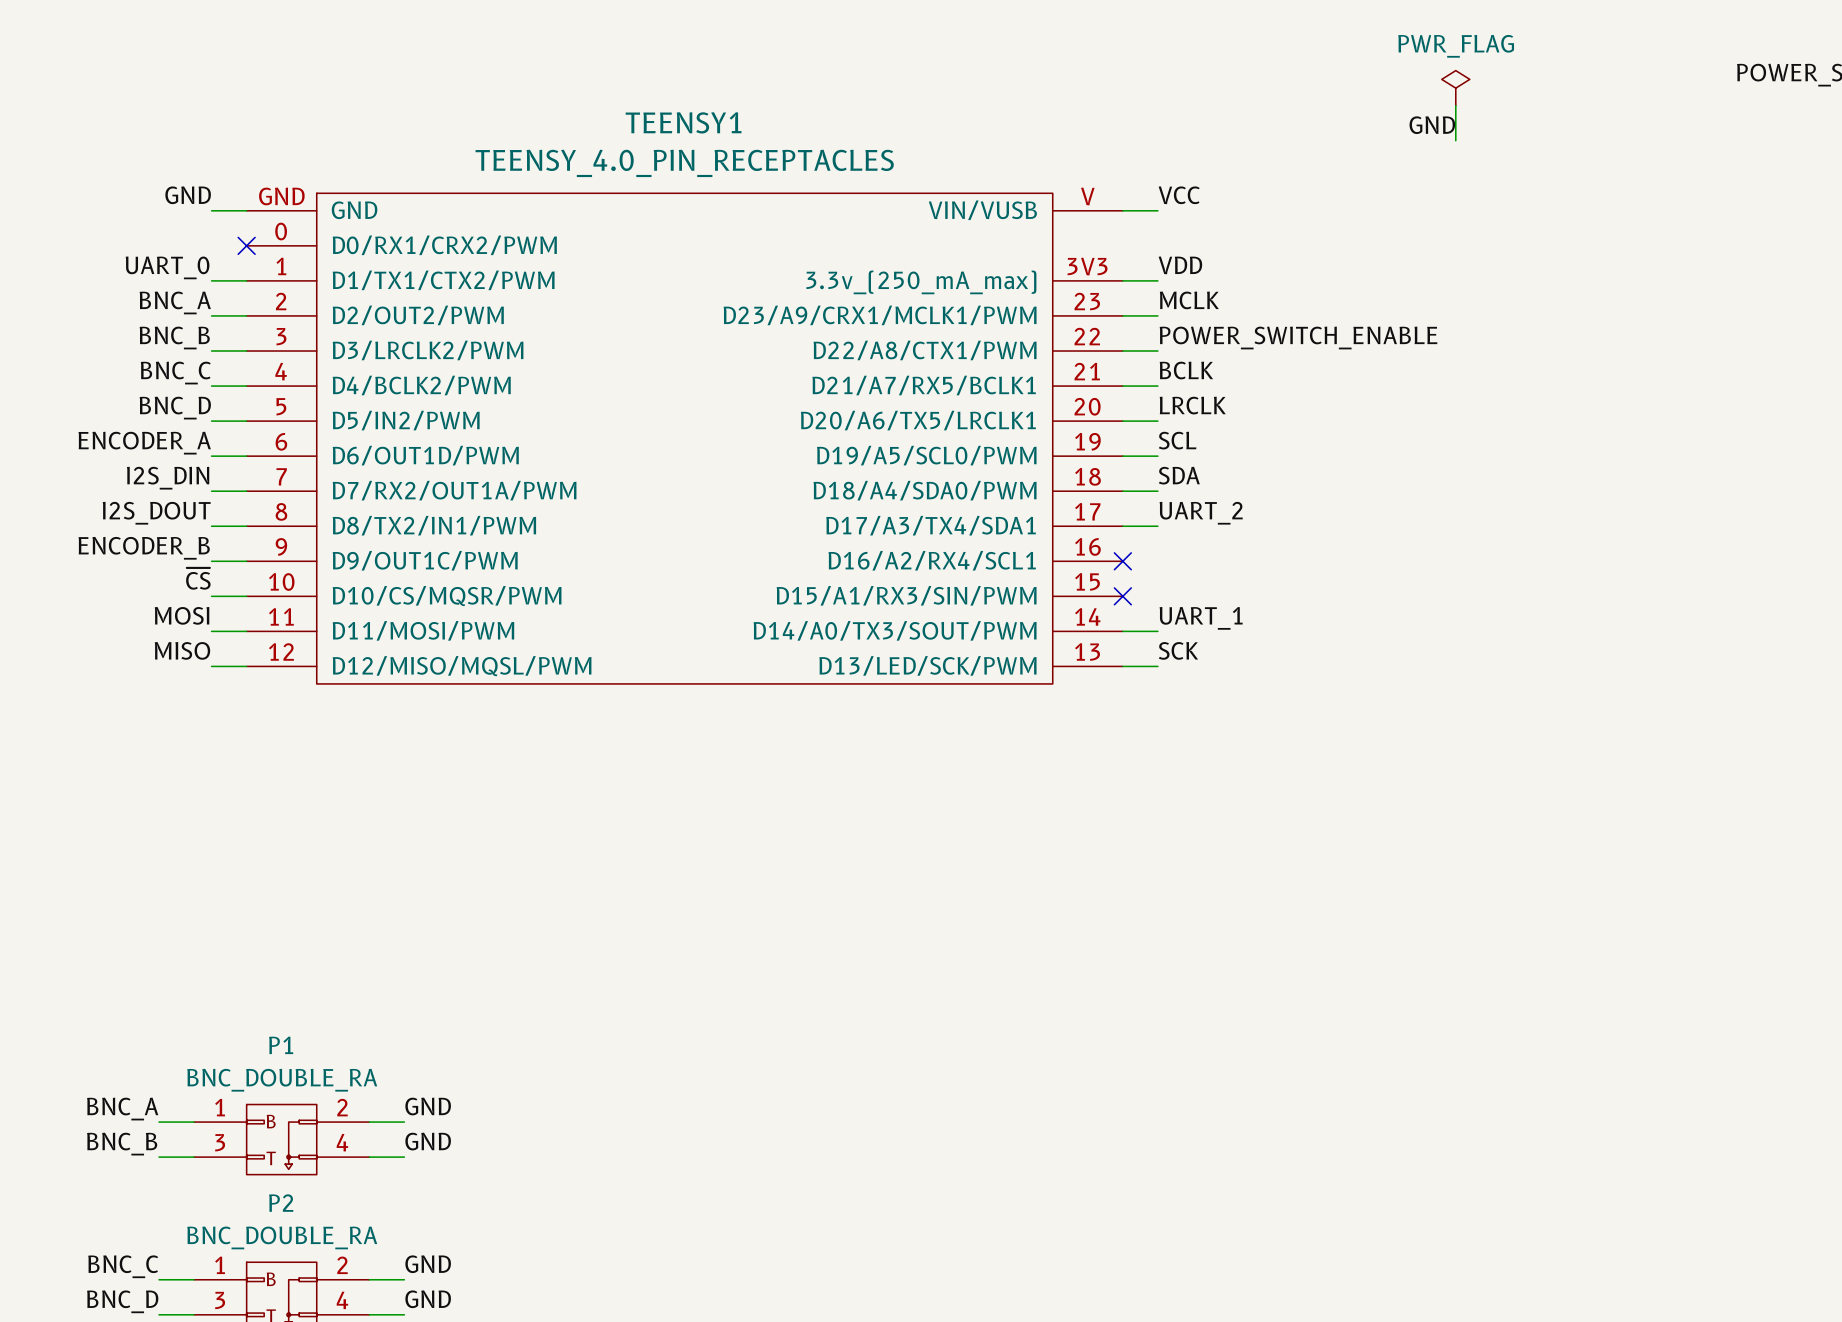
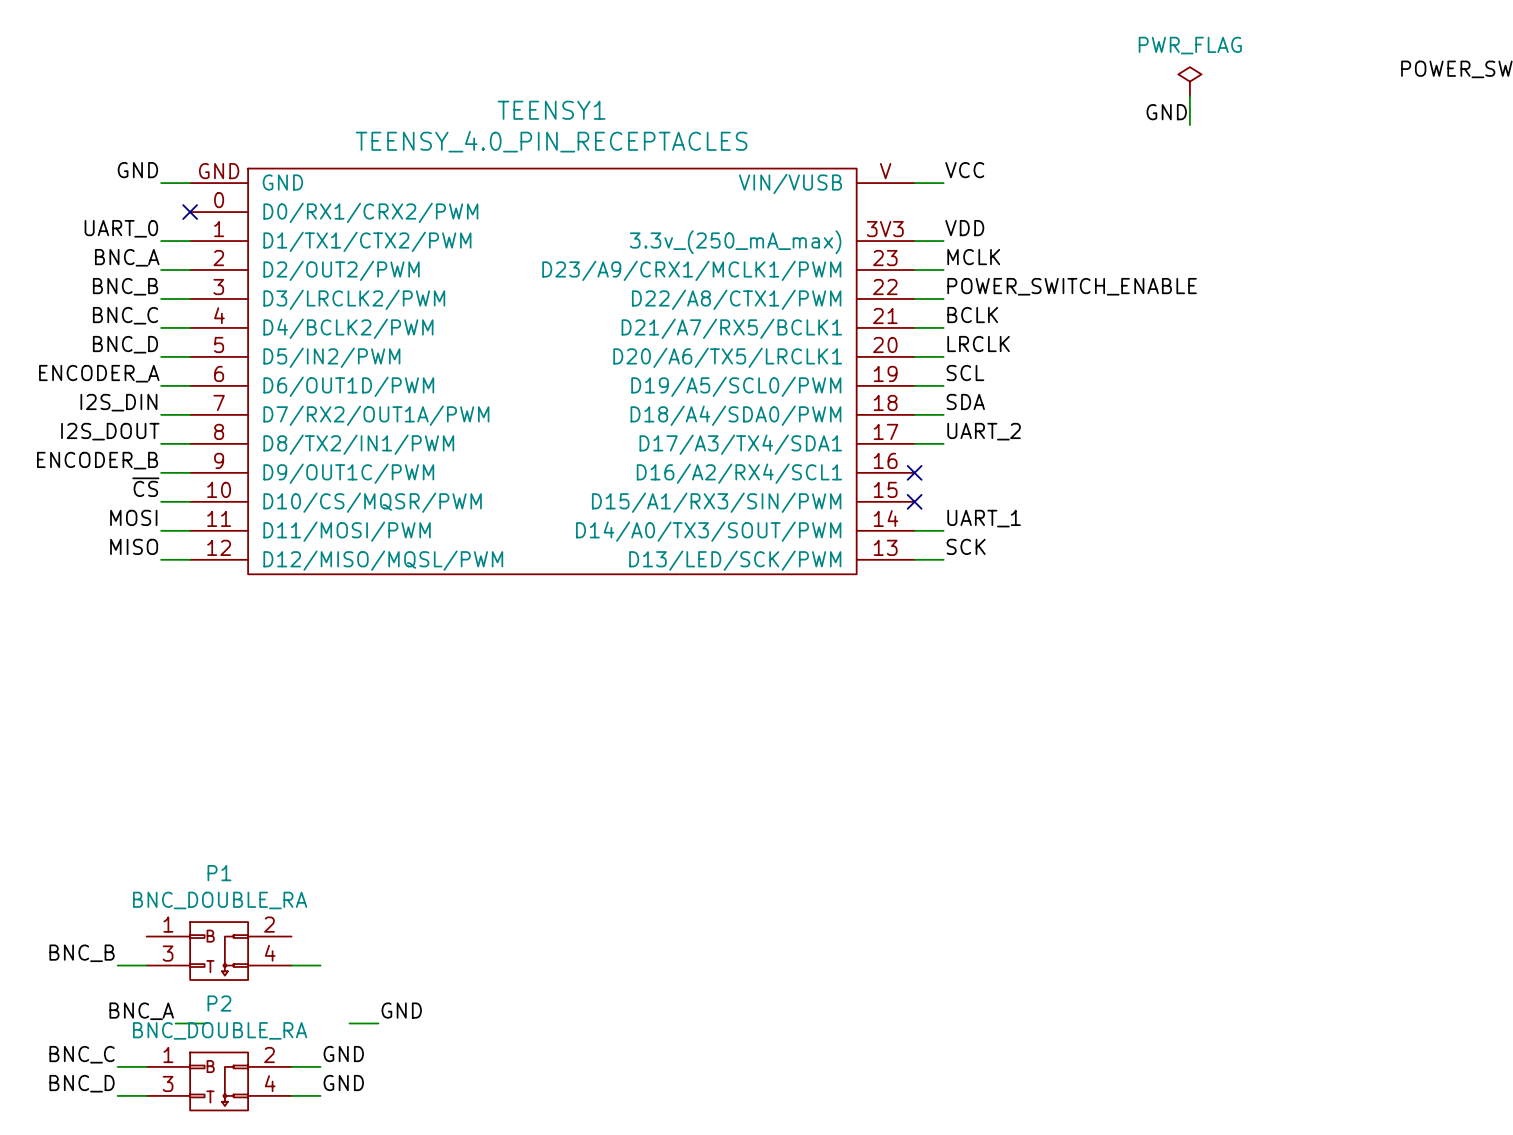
label: GND (428, 1106) -> none
label position: BNC_A (122, 1109) -> BNC_A (141, 1011)
wire: (159, 1122) (194, 1122) -> (175, 1023) (204, 1023)
wire: (369, 1122) (404, 1122) -> (349, 1023) (378, 1023)
label: GND (428, 1141) -> none
label: none -> GND (401, 1010)

